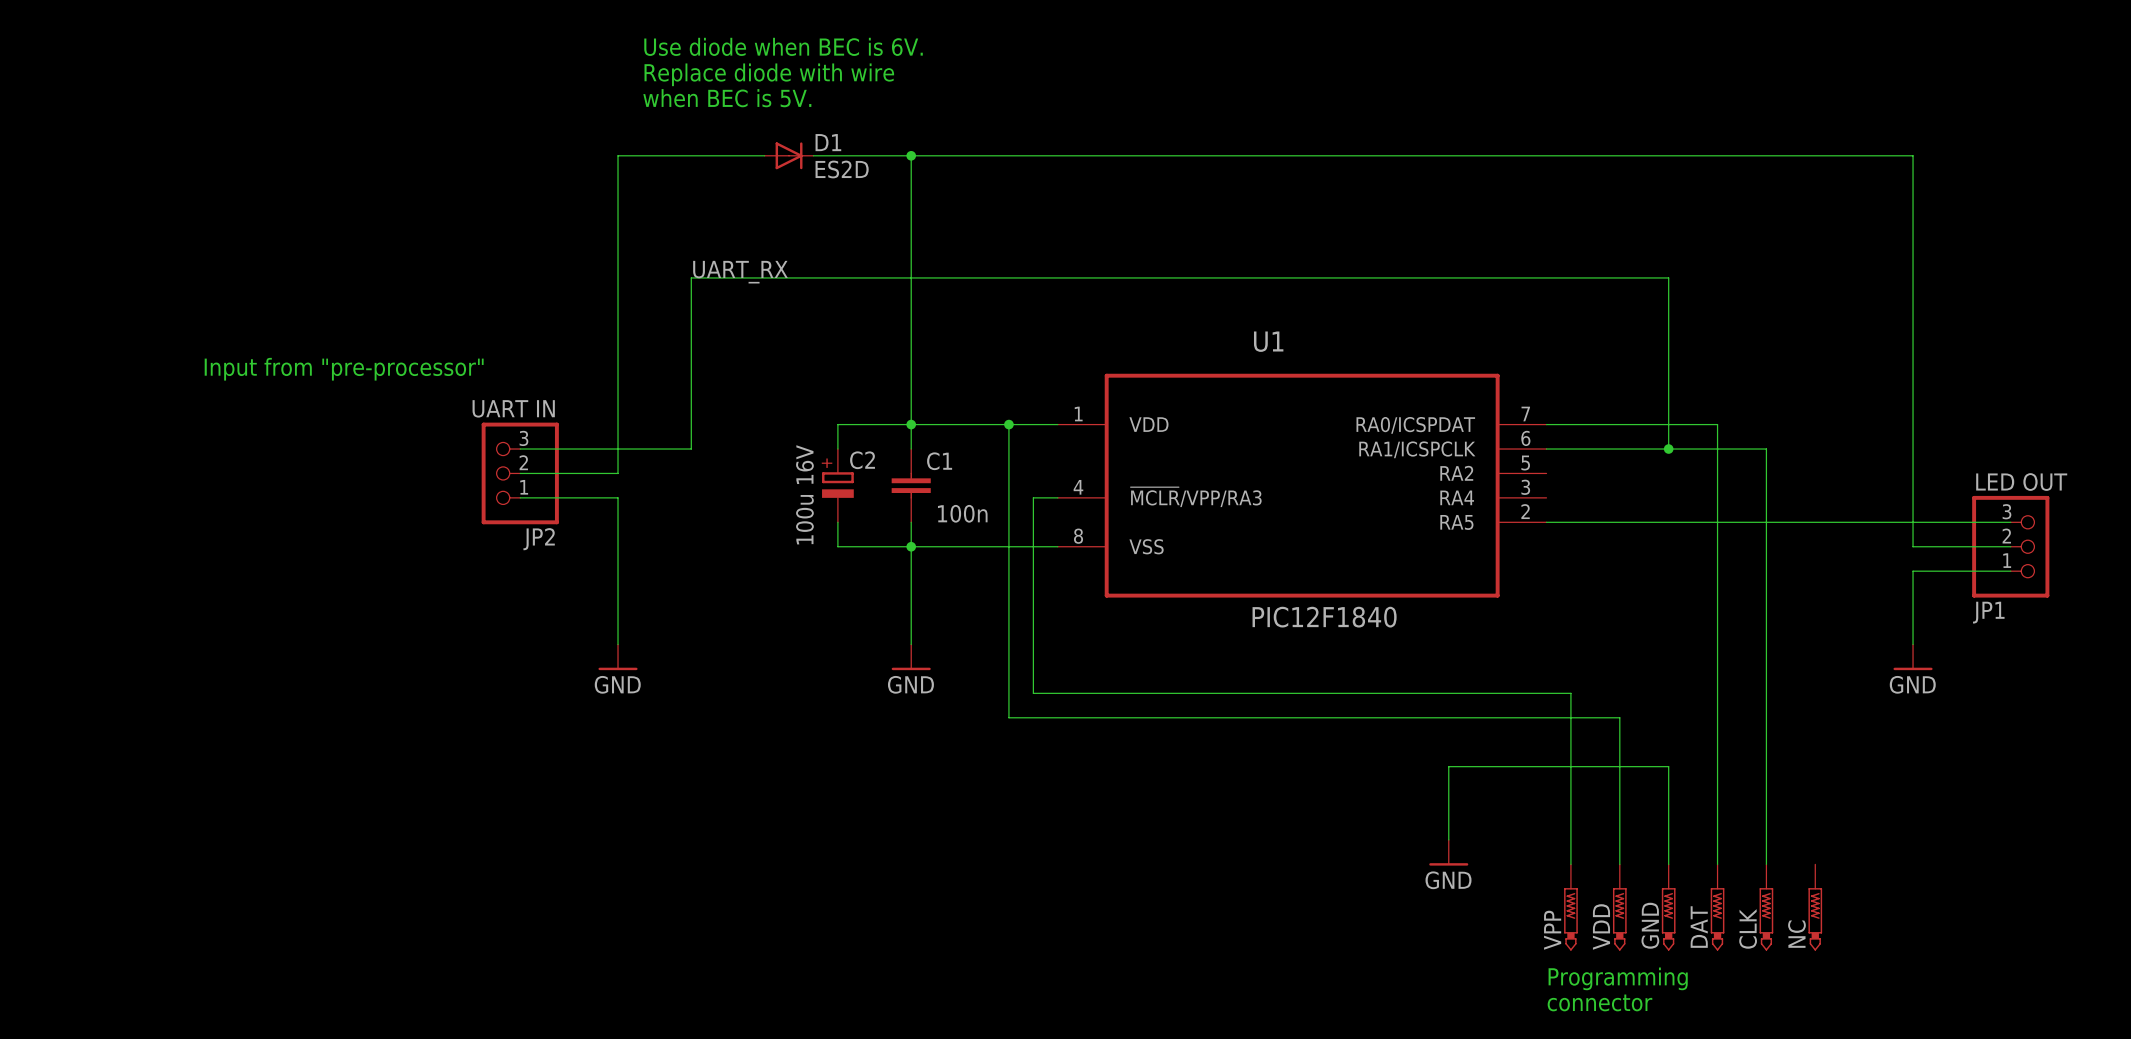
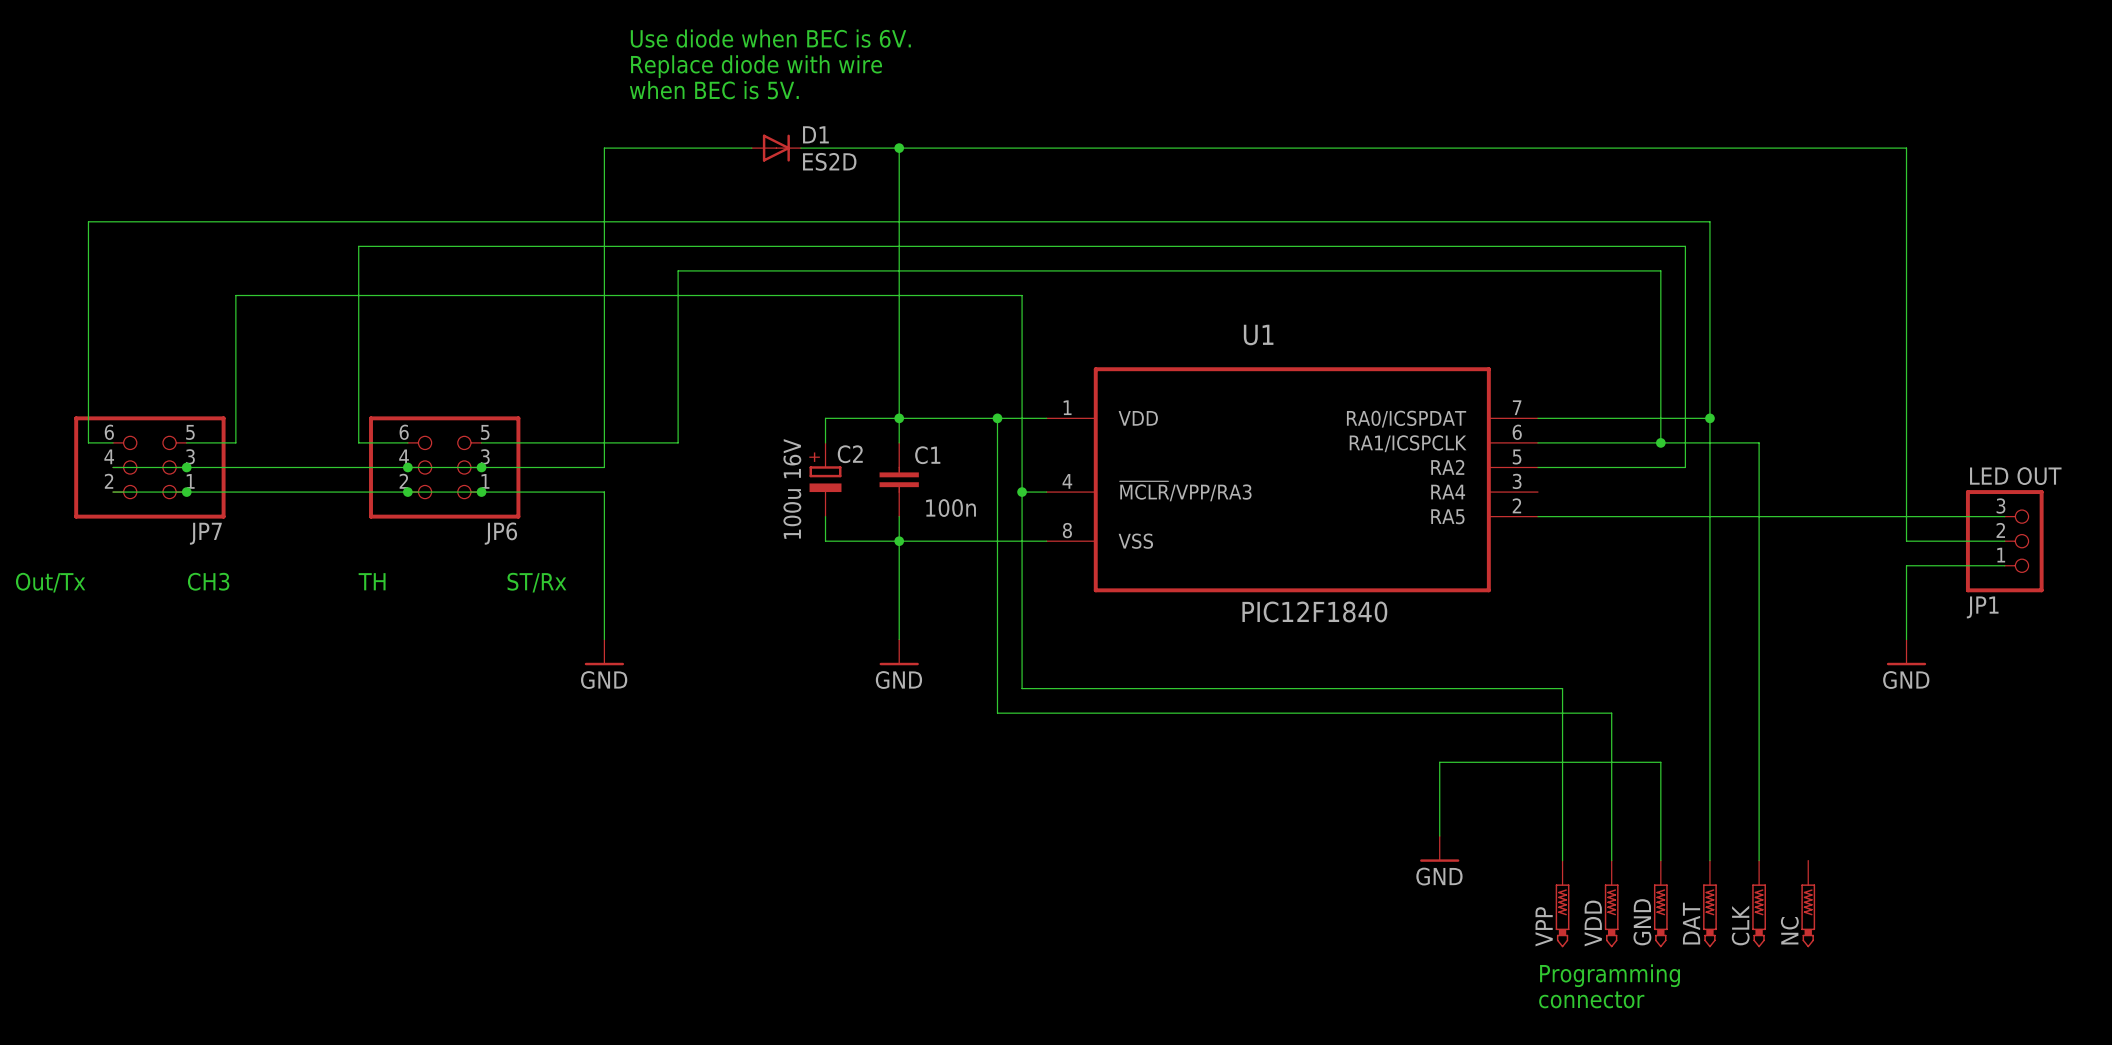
label: UART_RX (740, 272) -> none
text: Input from "pre-processor" (344, 369) -> none
wire: none -> (1709, 418) (1709, 221) (88, 221) (88, 442) (113, 442)
junction: none -> (1709, 418)
wire: none -> (186, 442) (235, 442) (235, 295) (1022, 295) (1022, 492)
wire: none -> (407, 442) (358, 442) (358, 246) (1685, 246) (1685, 467) (1537, 467)
wire: none -> (481, 442) (506, 442)
wire: none -> (113, 467) (506, 467)
JP7: none -> (149, 467)
junction: none -> (186, 467)
junction: none -> (407, 467)
JP6: none -> (444, 467)
junction: none -> (481, 467)
JP2: UART IN (520, 473) -> none
wire: none -> (113, 492) (506, 492)
junction: none -> (186, 492)
junction: none -> (407, 492)
junction: none -> (481, 492)
junction: none -> (1022, 492)
text: none -> CH3 (208, 581)
text: none -> TH (372, 581)
text: none -> Out/Tx (50, 582)
text: none -> ST/Rx (536, 582)

